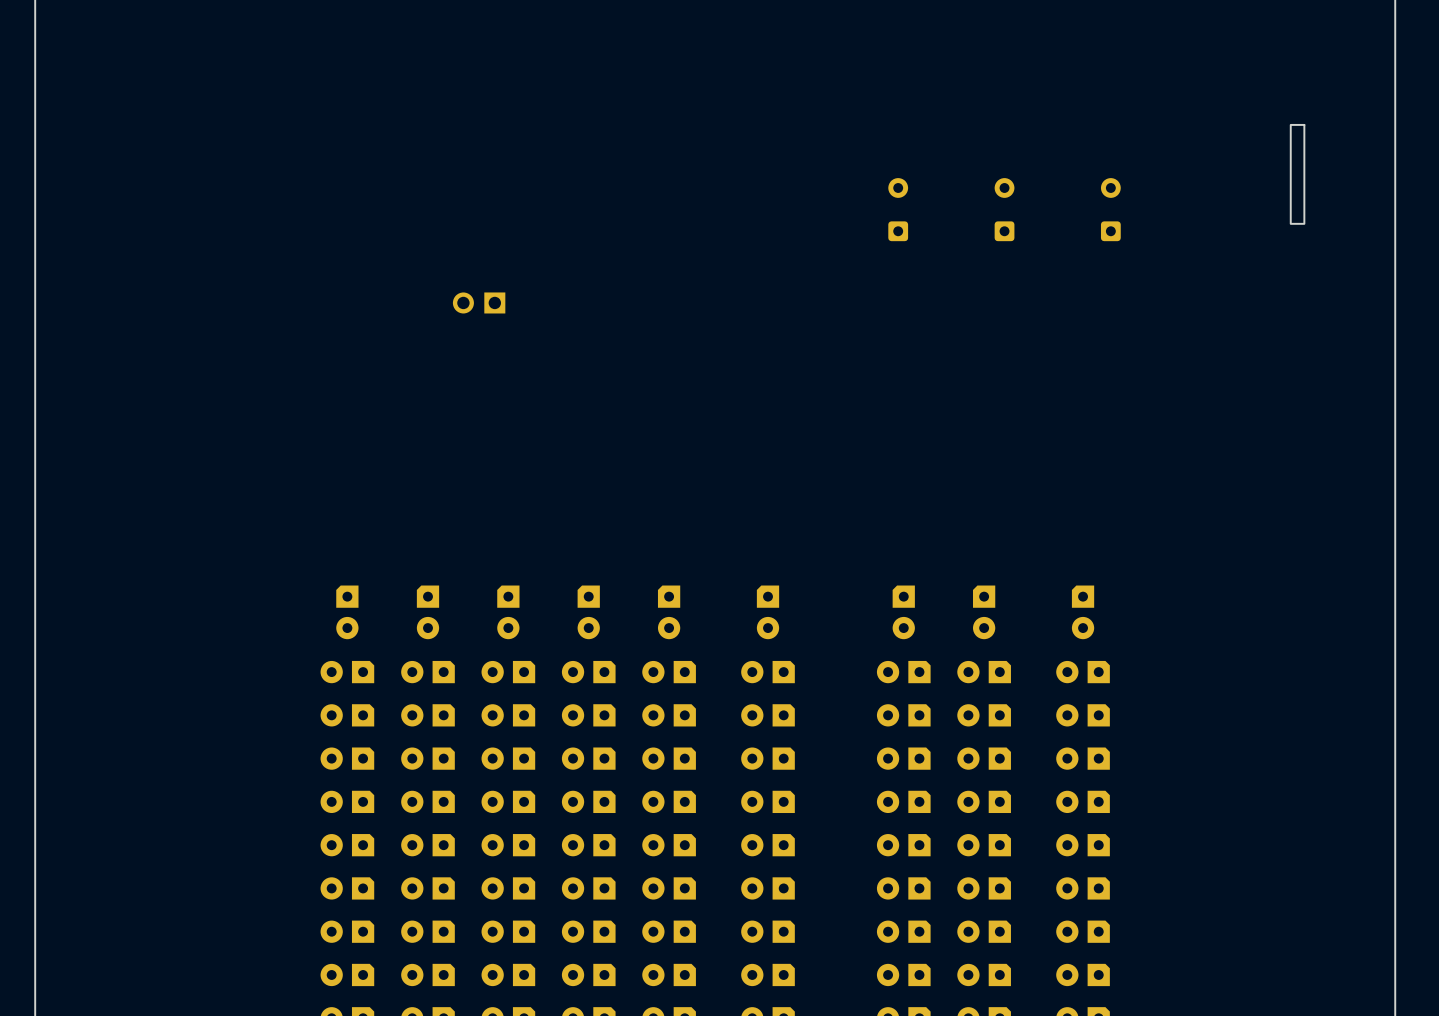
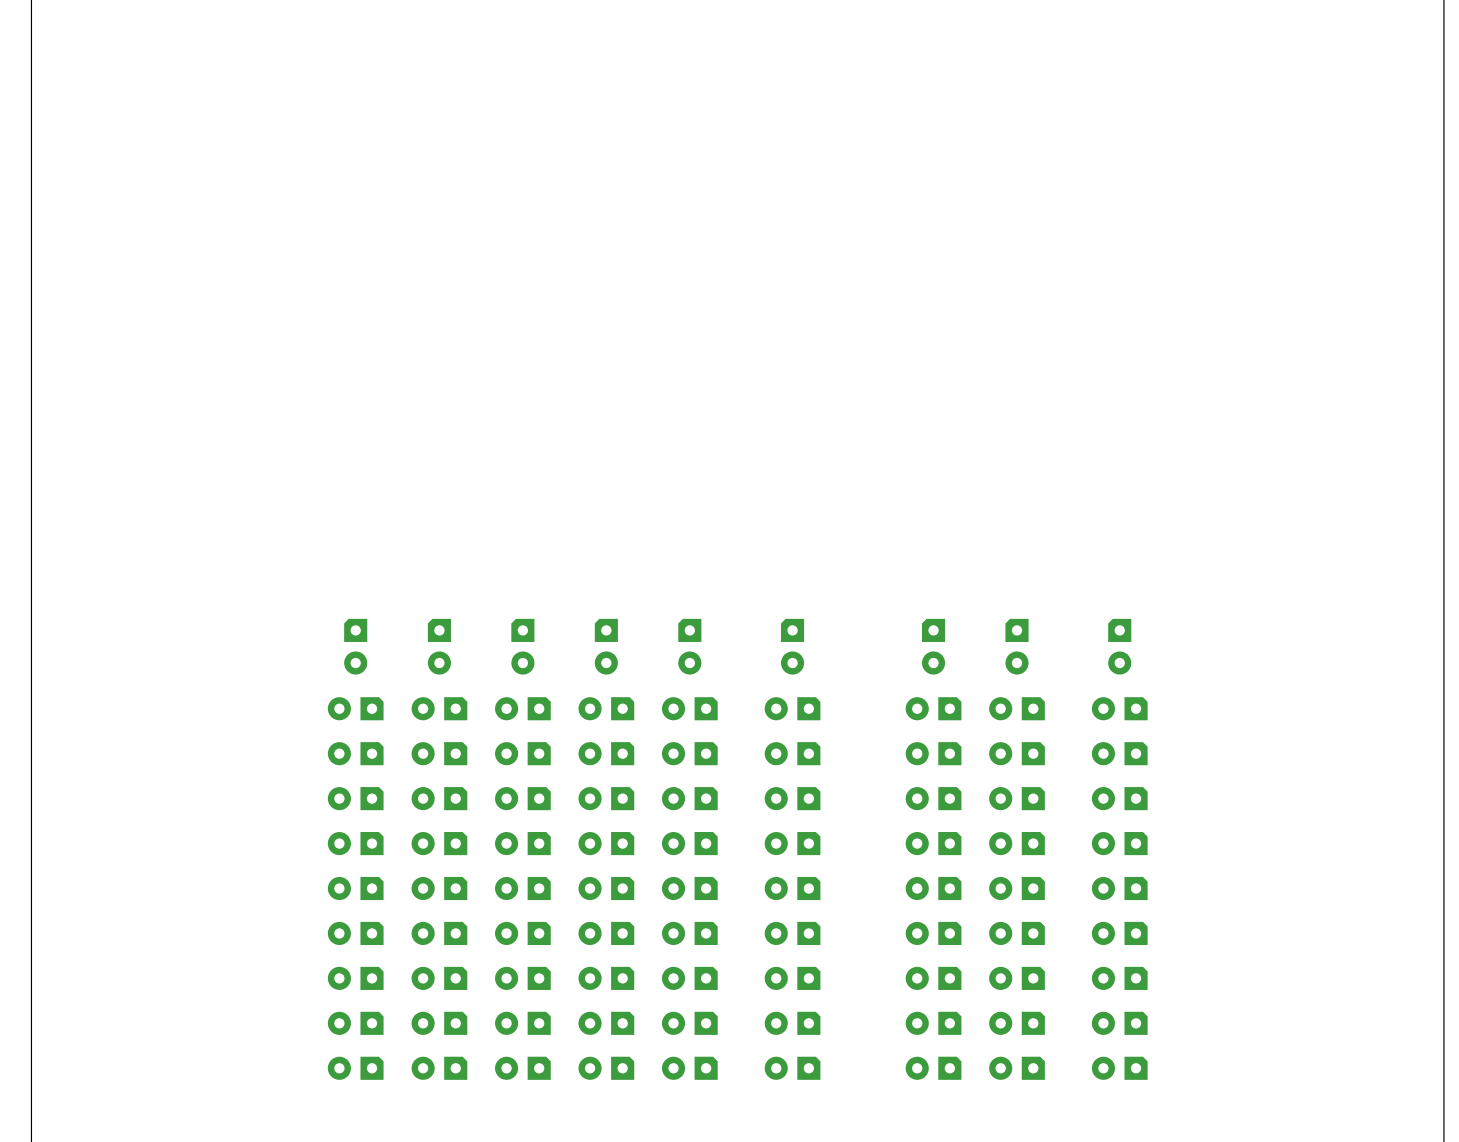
part: (1297, 174) -> none
part: (898, 209) -> none
part: (1004, 209) -> none
part: (1110, 209) -> none
part: (479, 302) -> none

